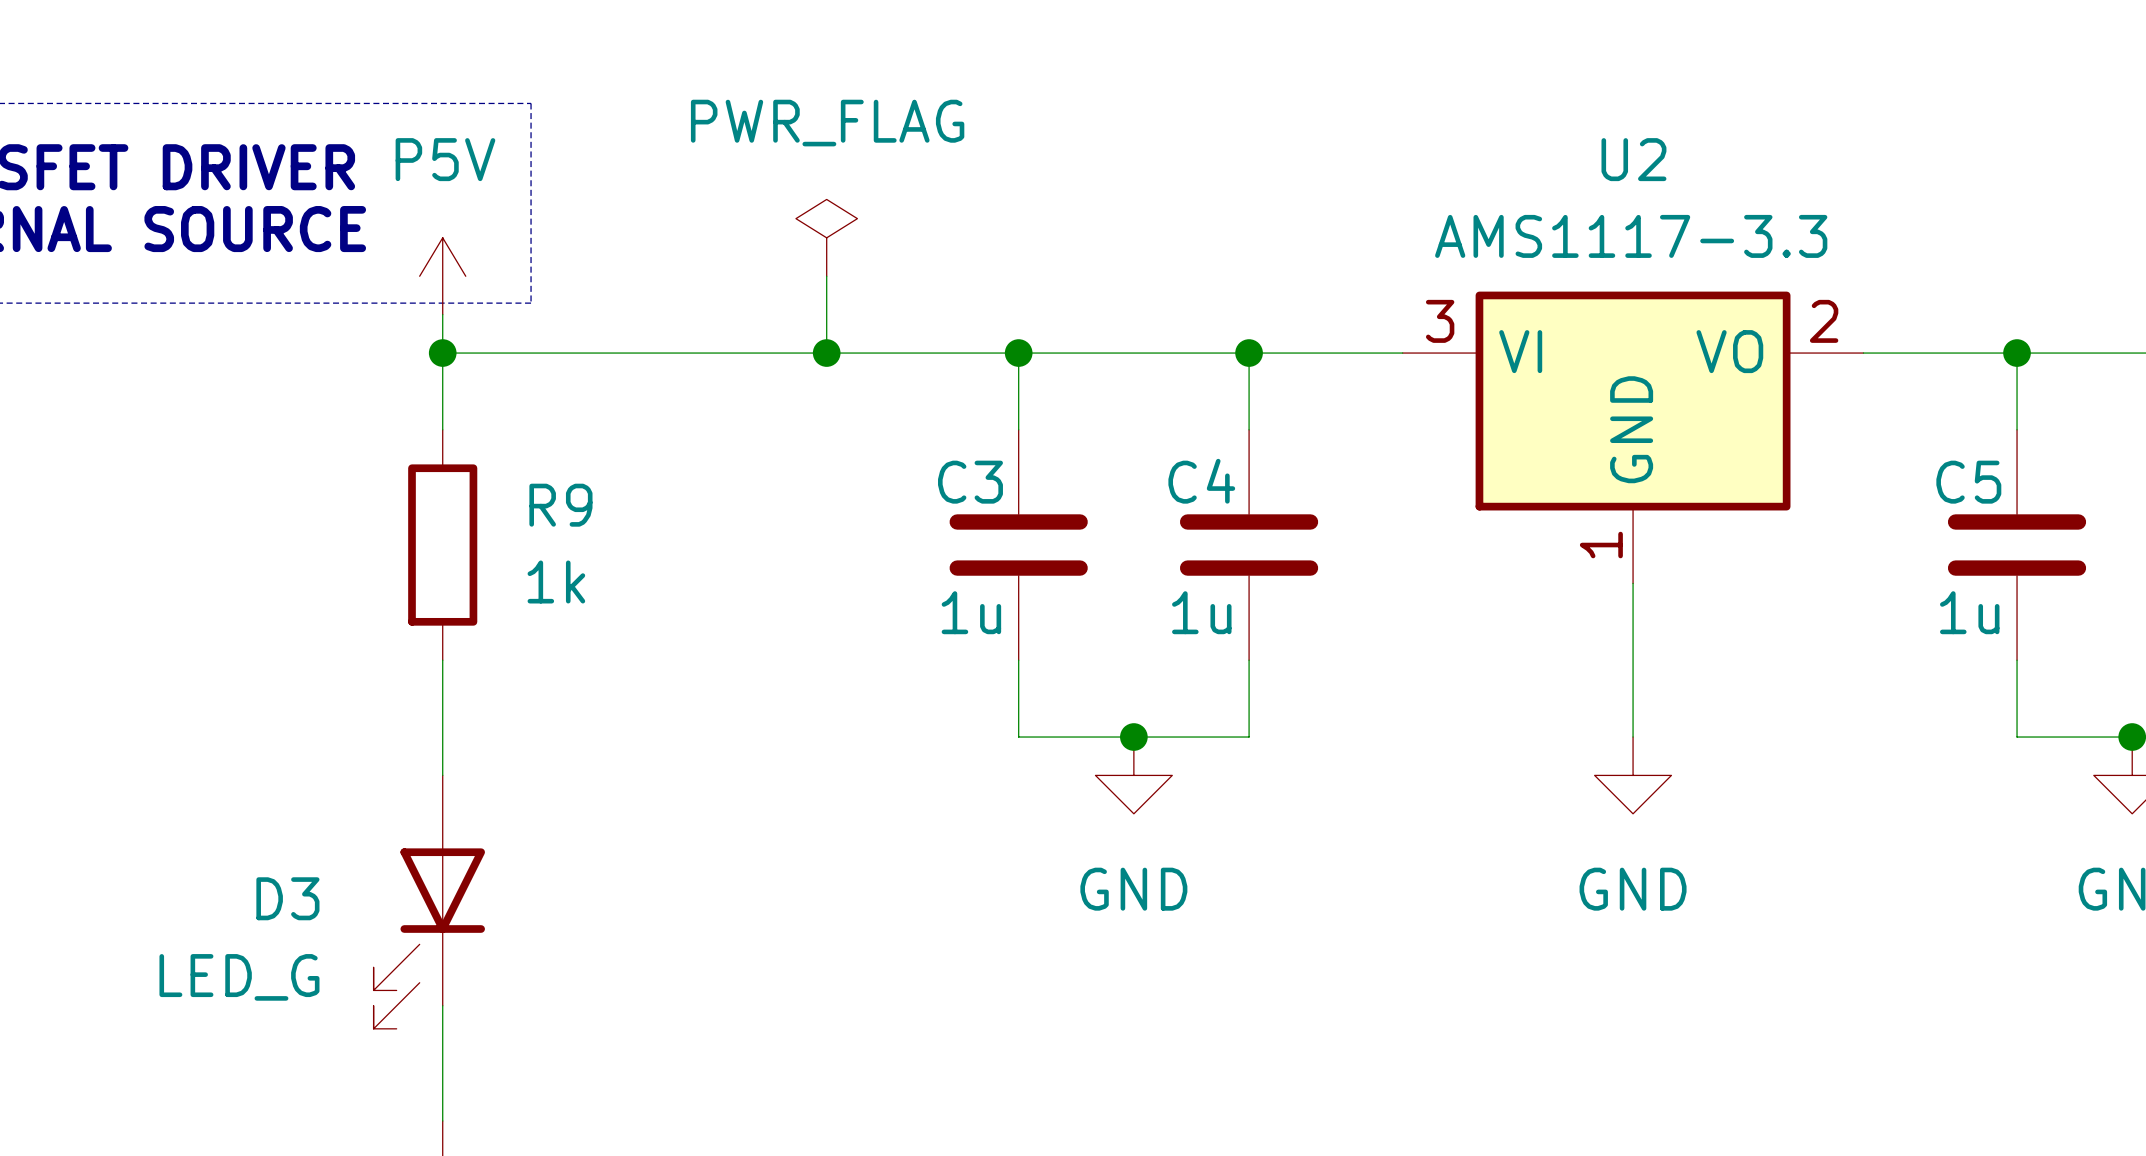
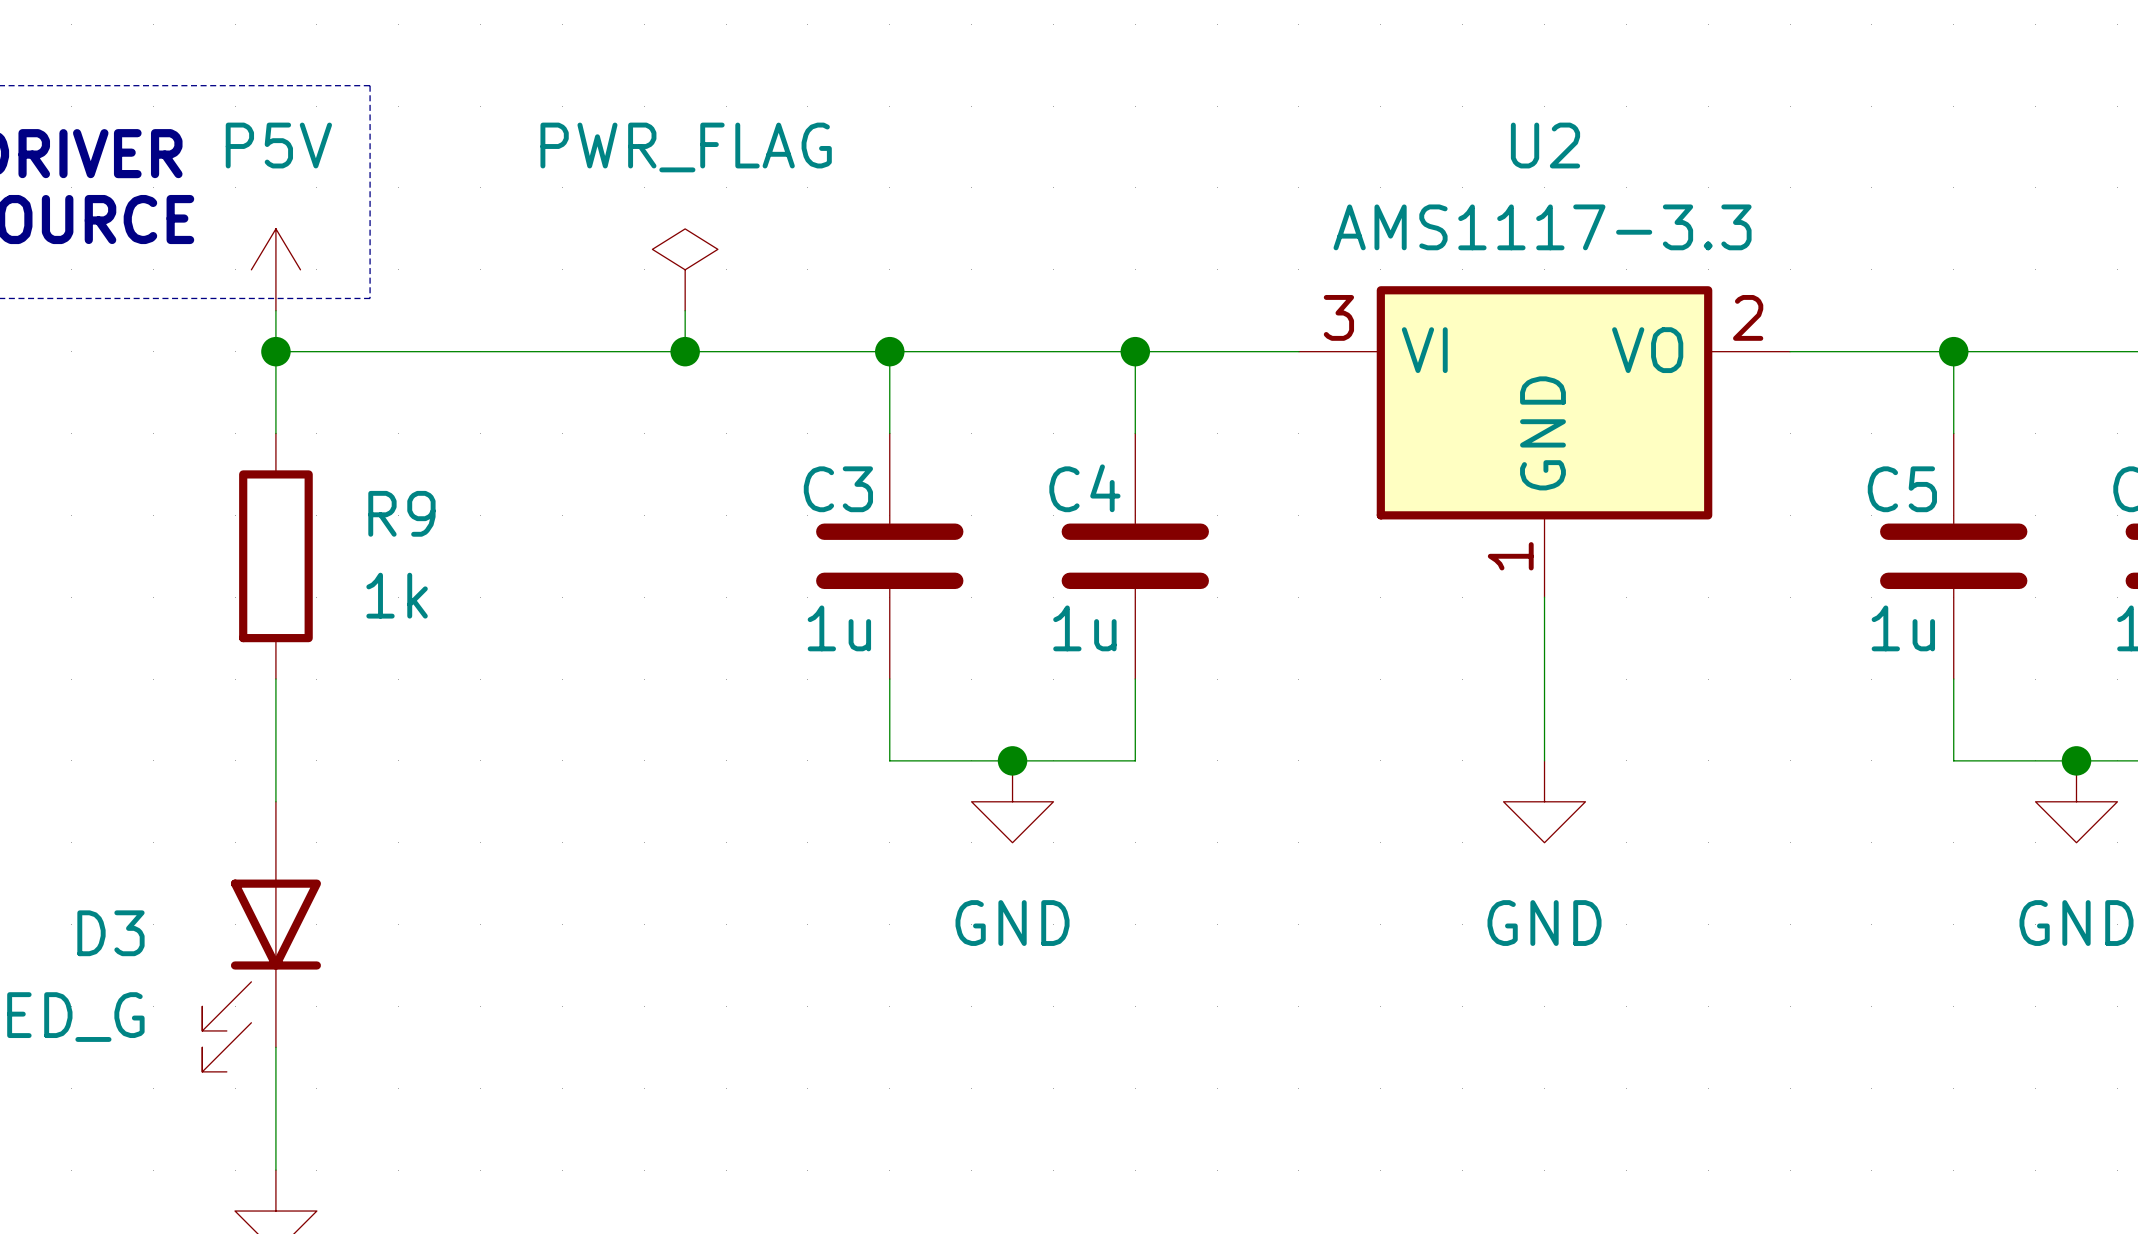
power symbol position: PWR_FLAG (826, 237) -> PWR_FLAG (685, 269)

